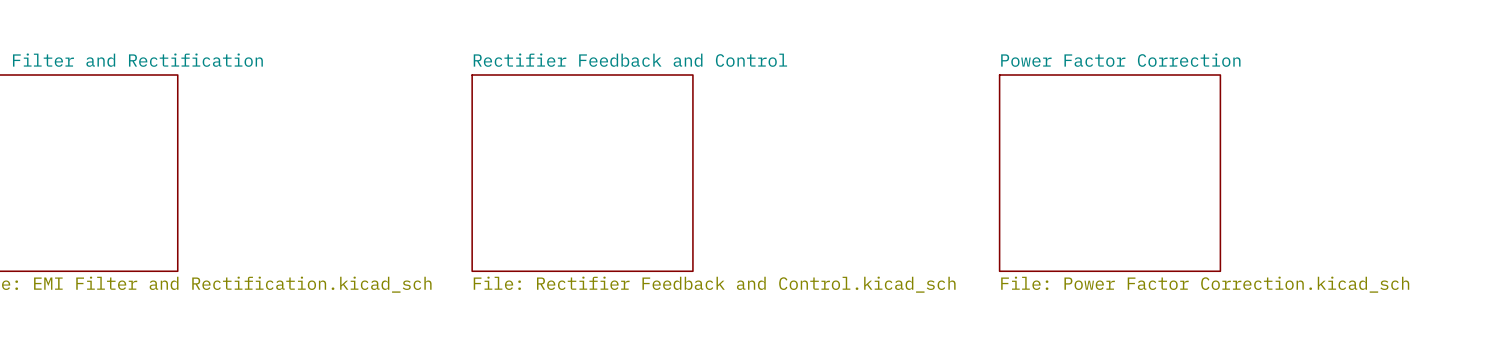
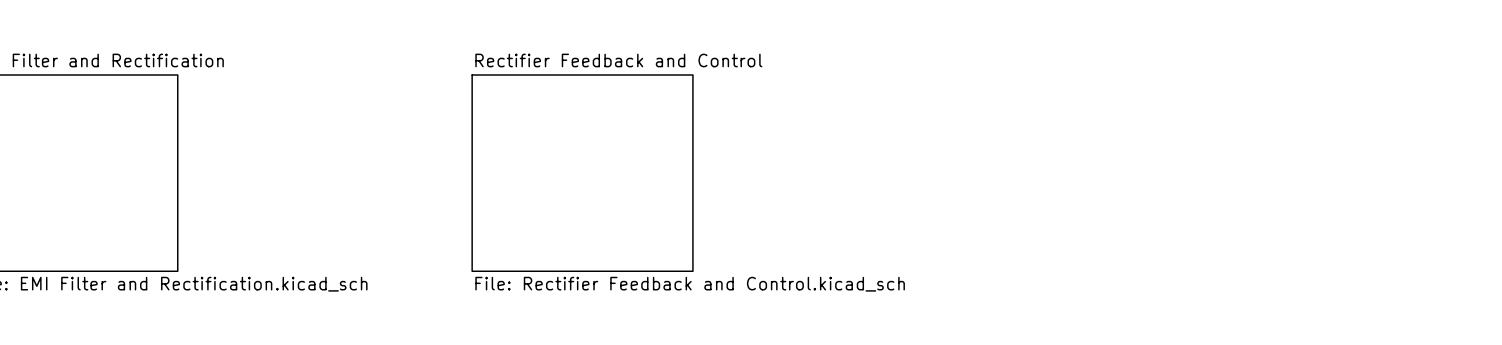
sheet Power Factor Correction: File: Power Factor Correction.kicad_sch (1109, 173) -> none

